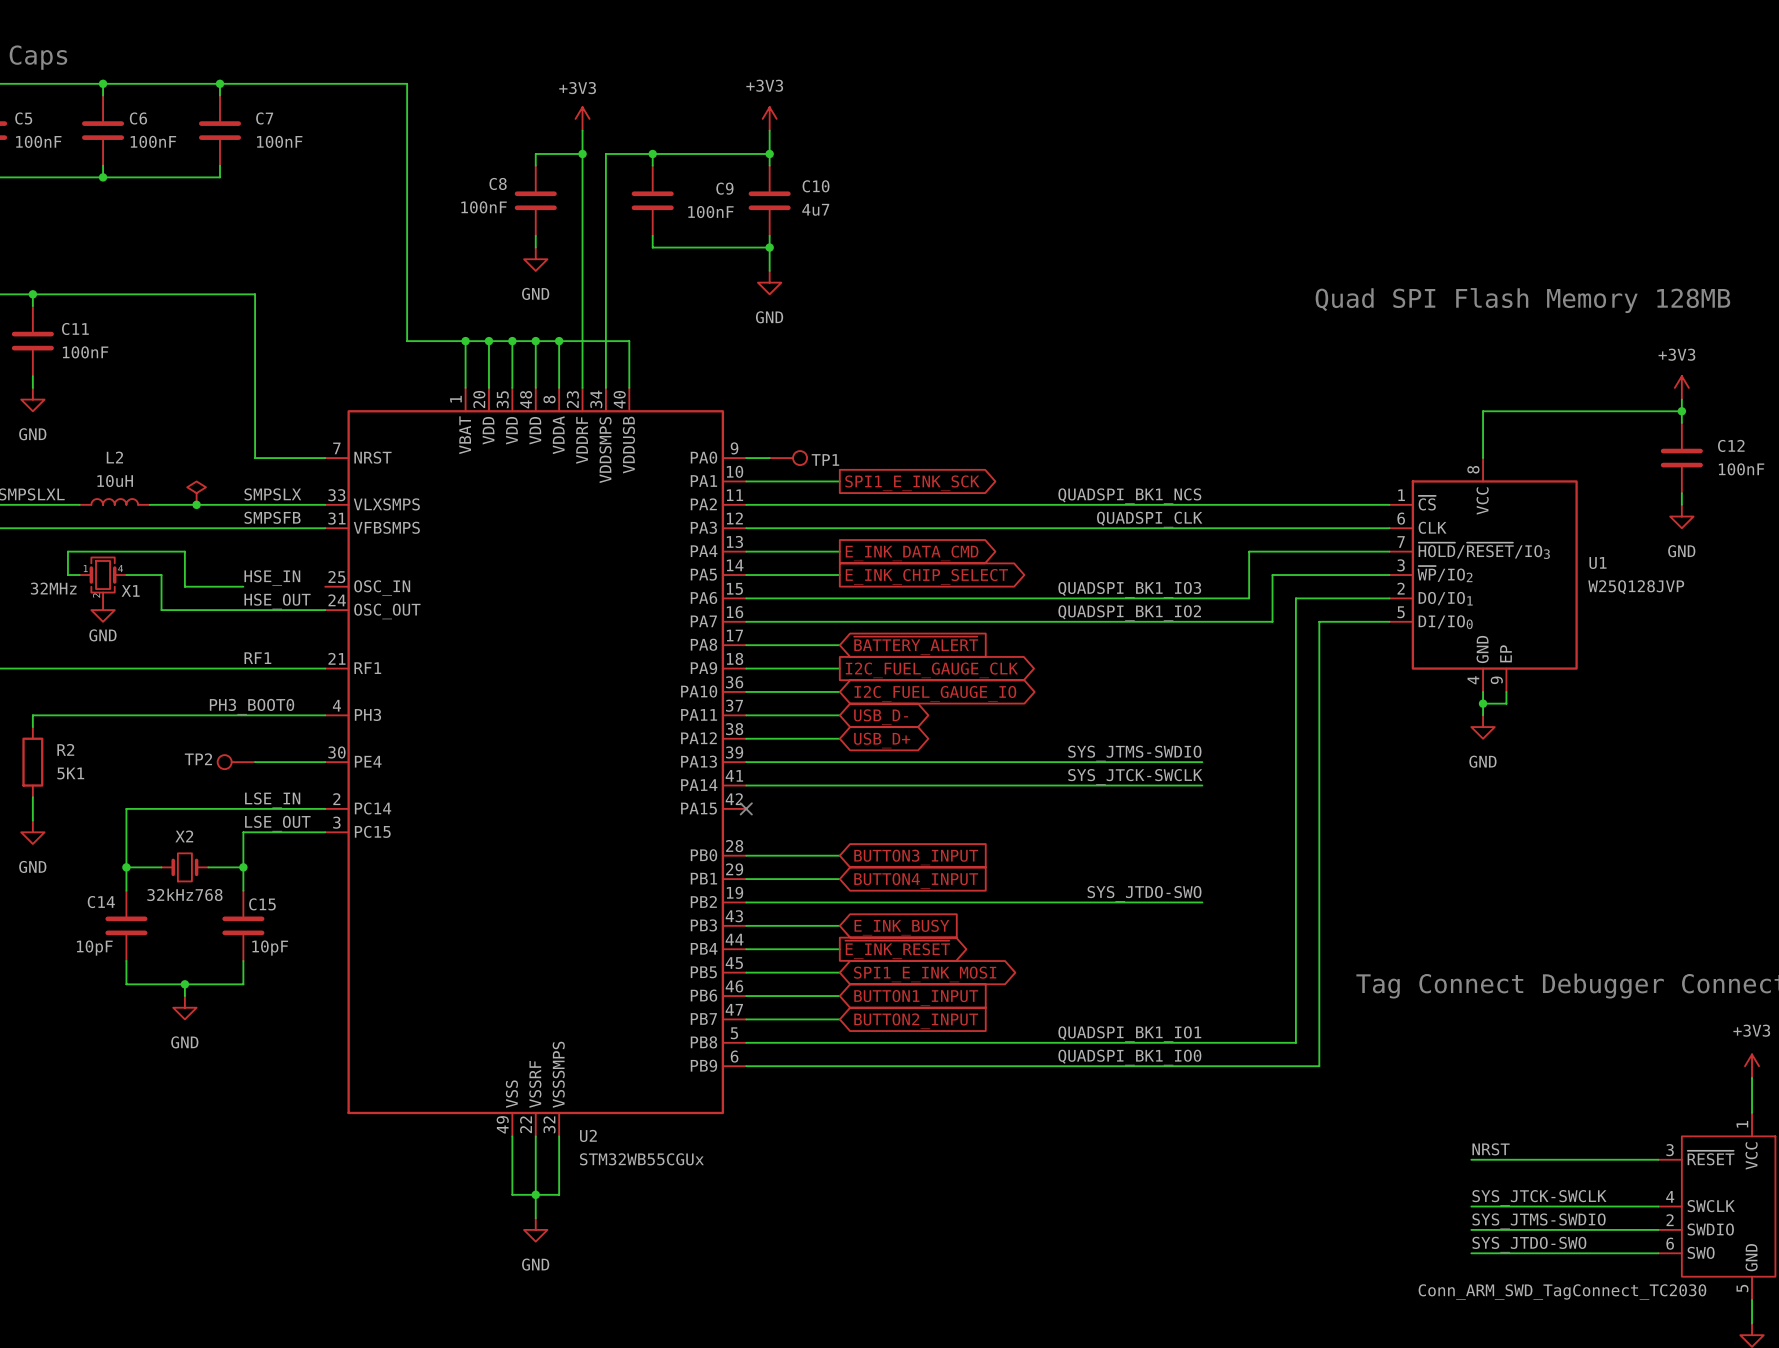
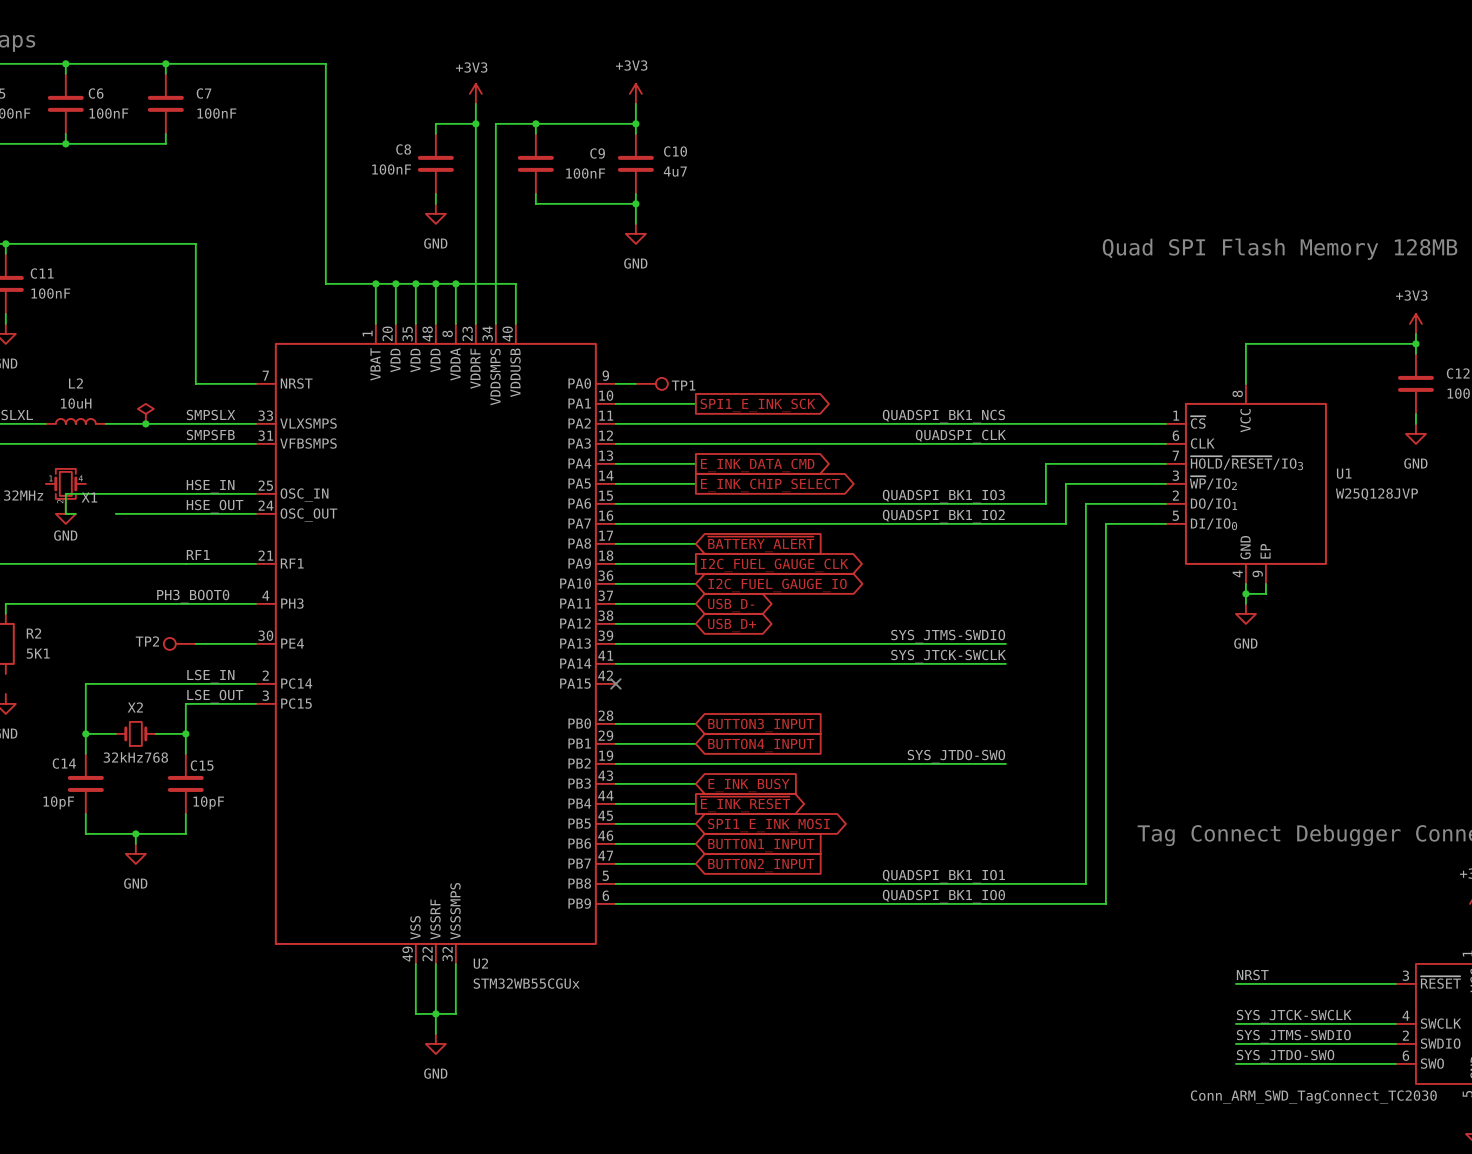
wire: (79, 575) (67, 575) (67, 551) (184, 551) (184, 586) -> (75, 513) (65, 513) (65, 493) (135, 493)
wire: (126, 575) (161, 575) (161, 610) -> none
wire: none -> (185, 493) (255, 493)
wire: (32, 797) (32, 820) -> none

